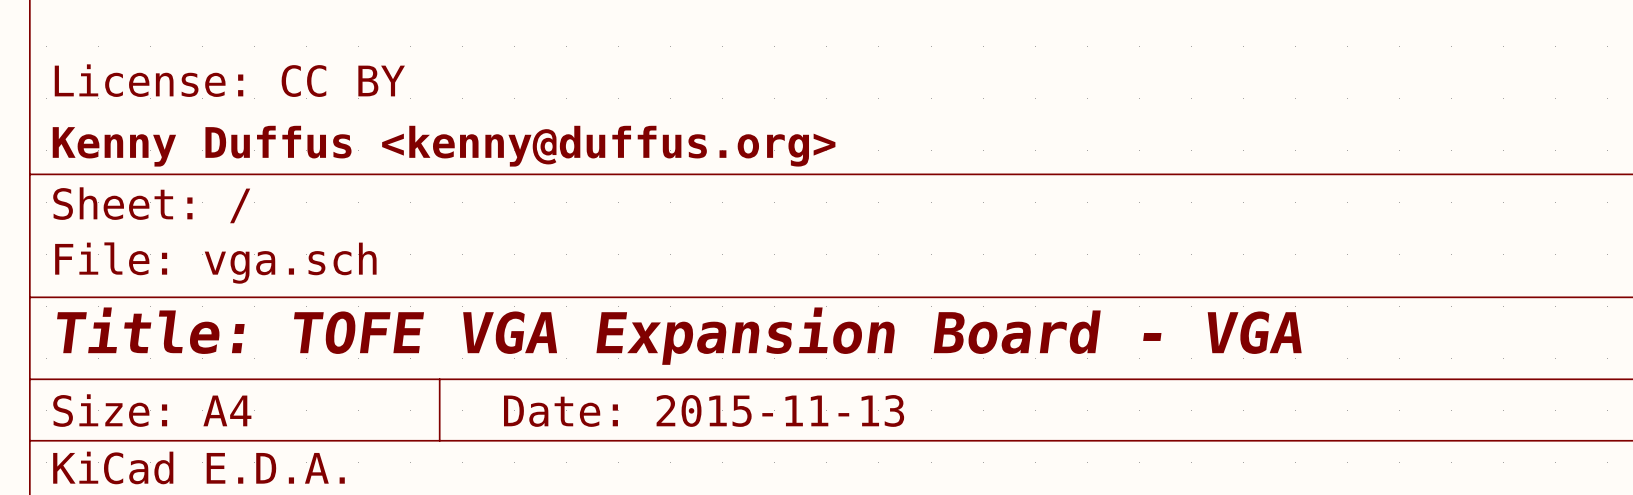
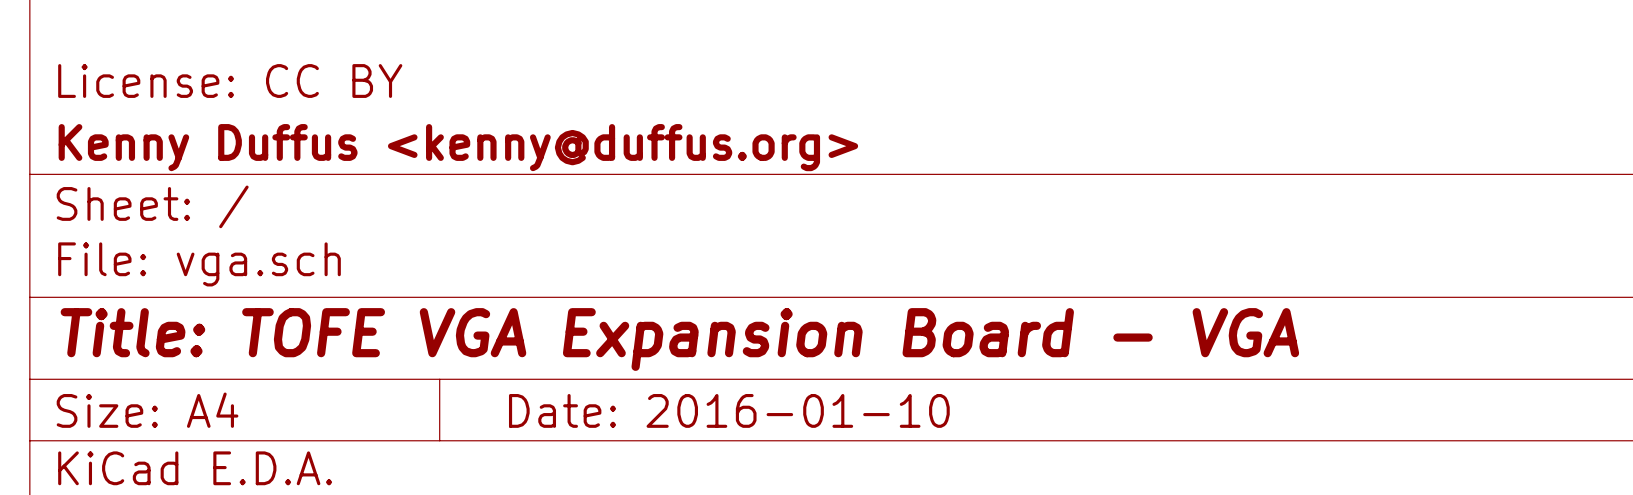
title block: Date: 2015-11-13 (704, 410) -> Date: 2016-01-10 (729, 410)

